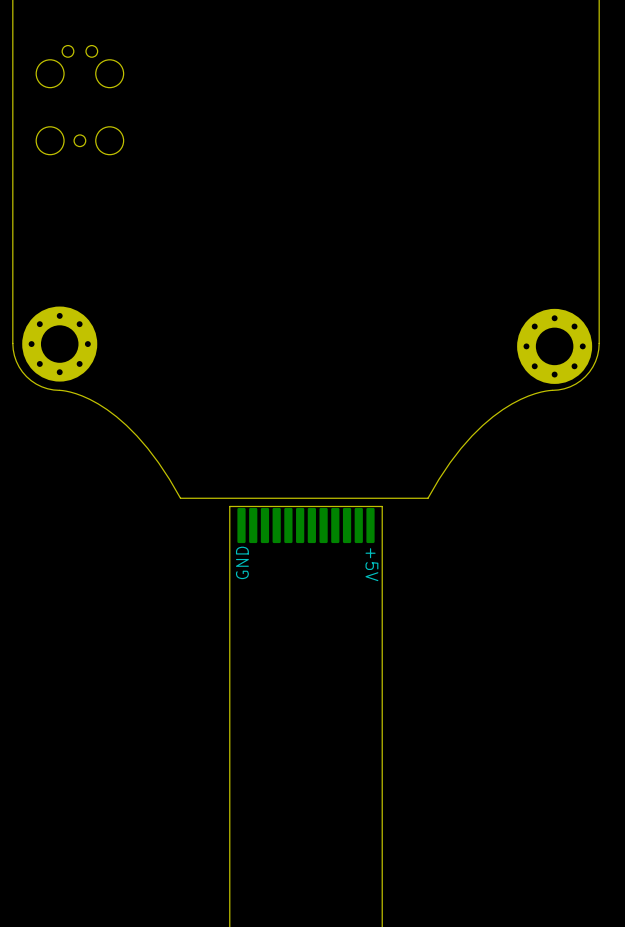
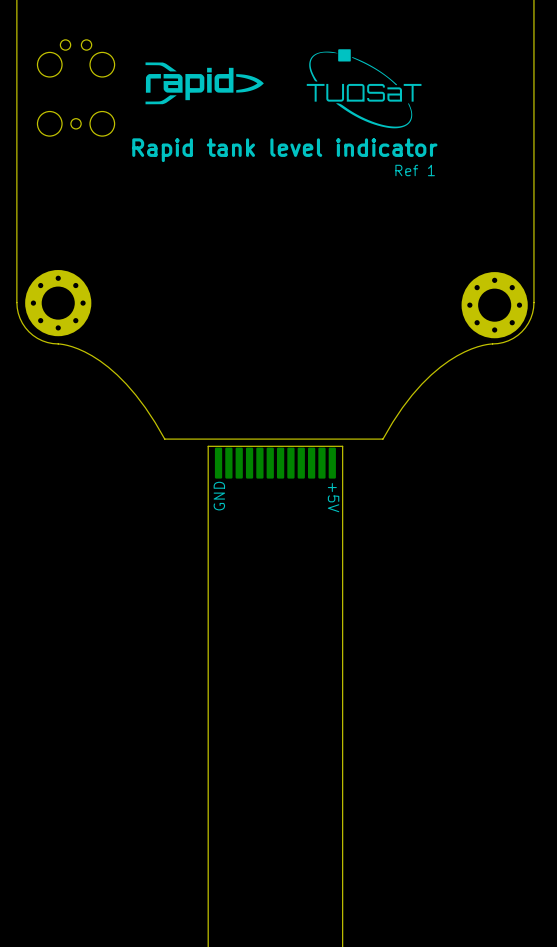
drawing: none -> [306, 49, 422, 129]
drawing: none -> [145, 62, 264, 105]
text: none -> Rapid tank level indicator (284, 150)
text: none -> Ref 1 (415, 170)

